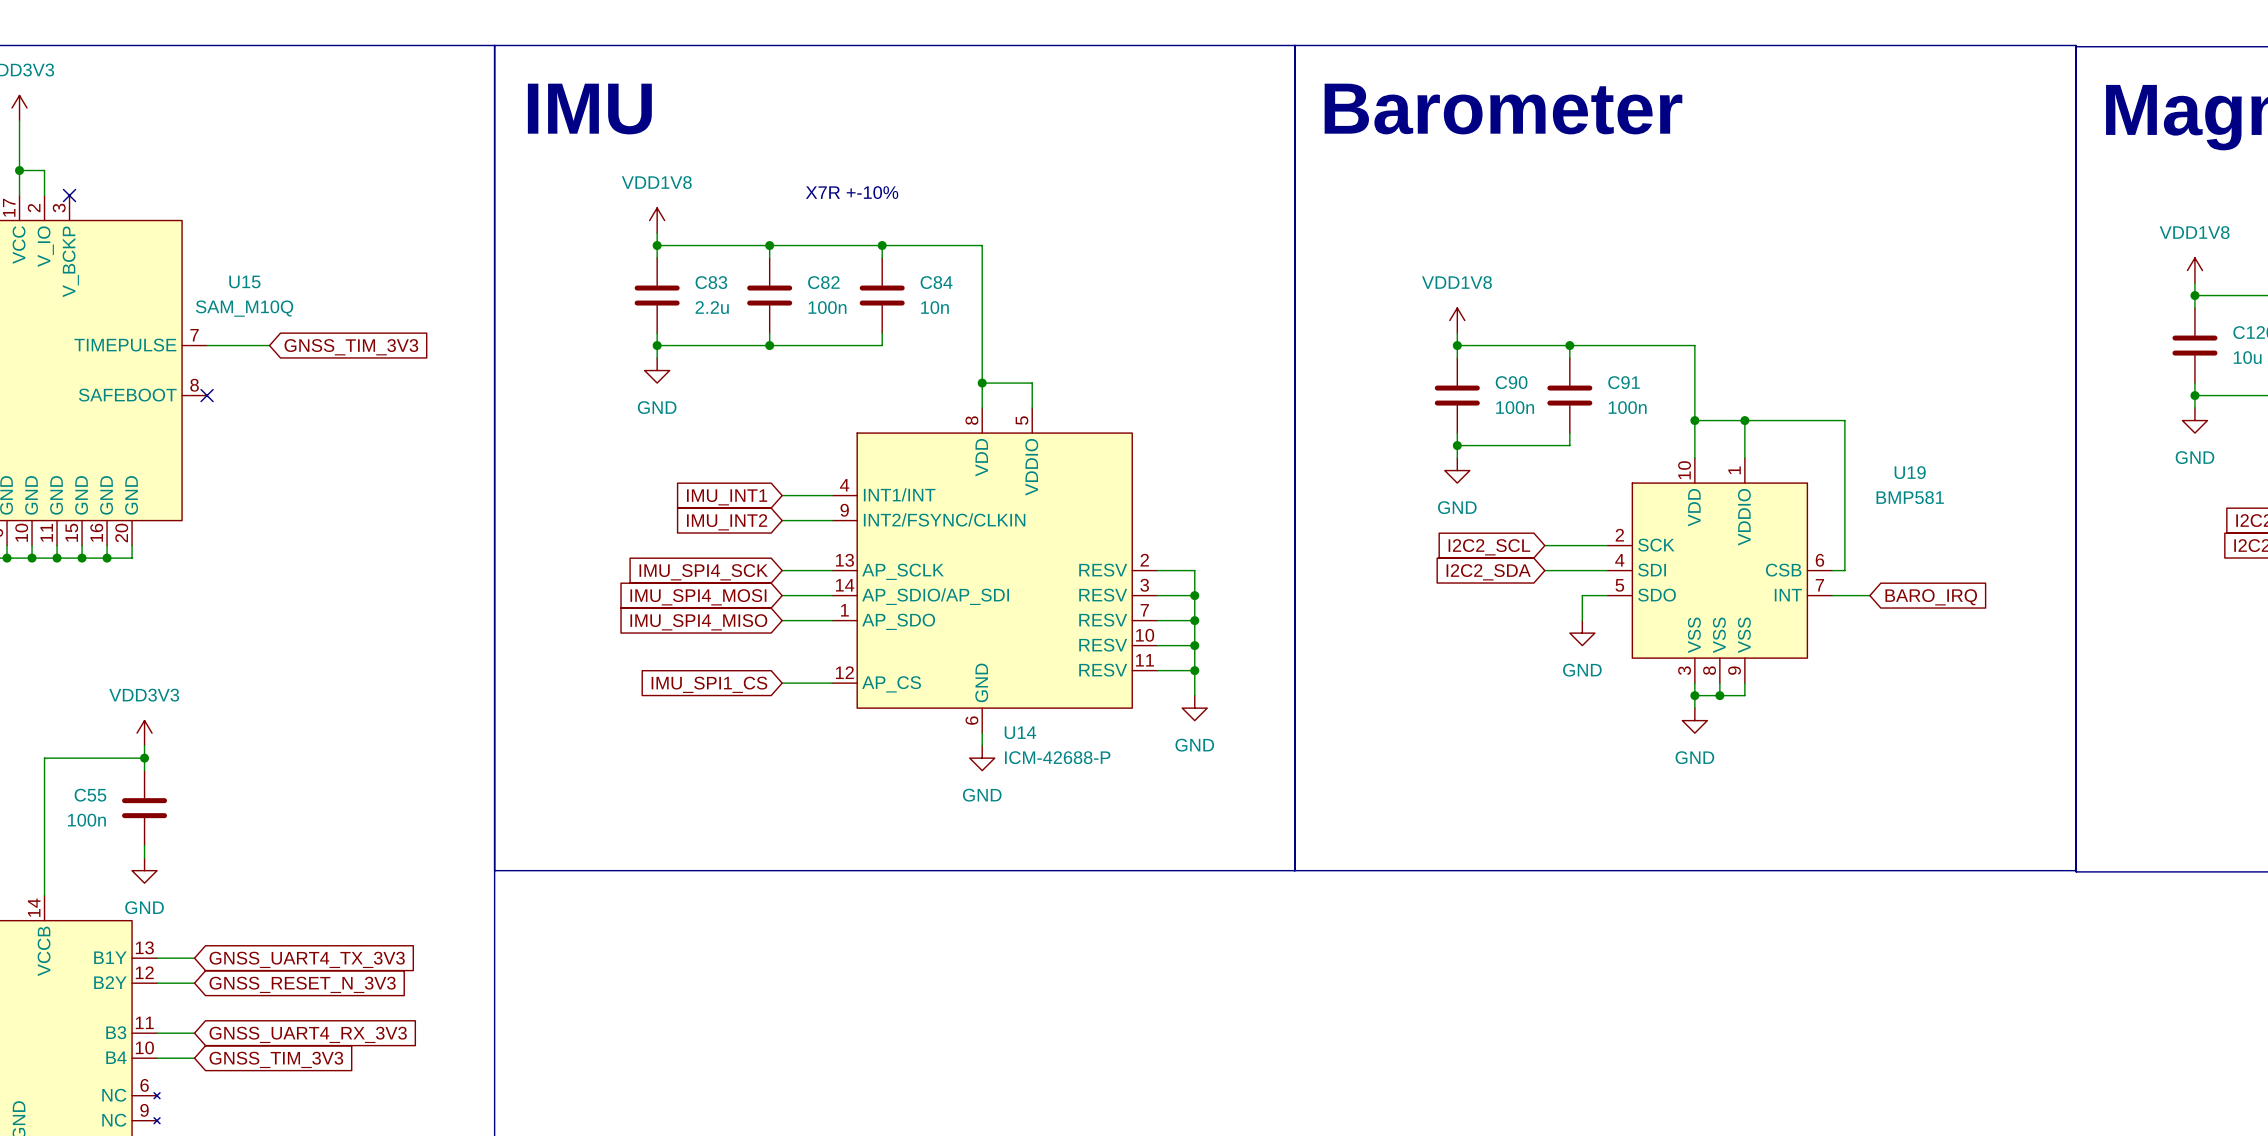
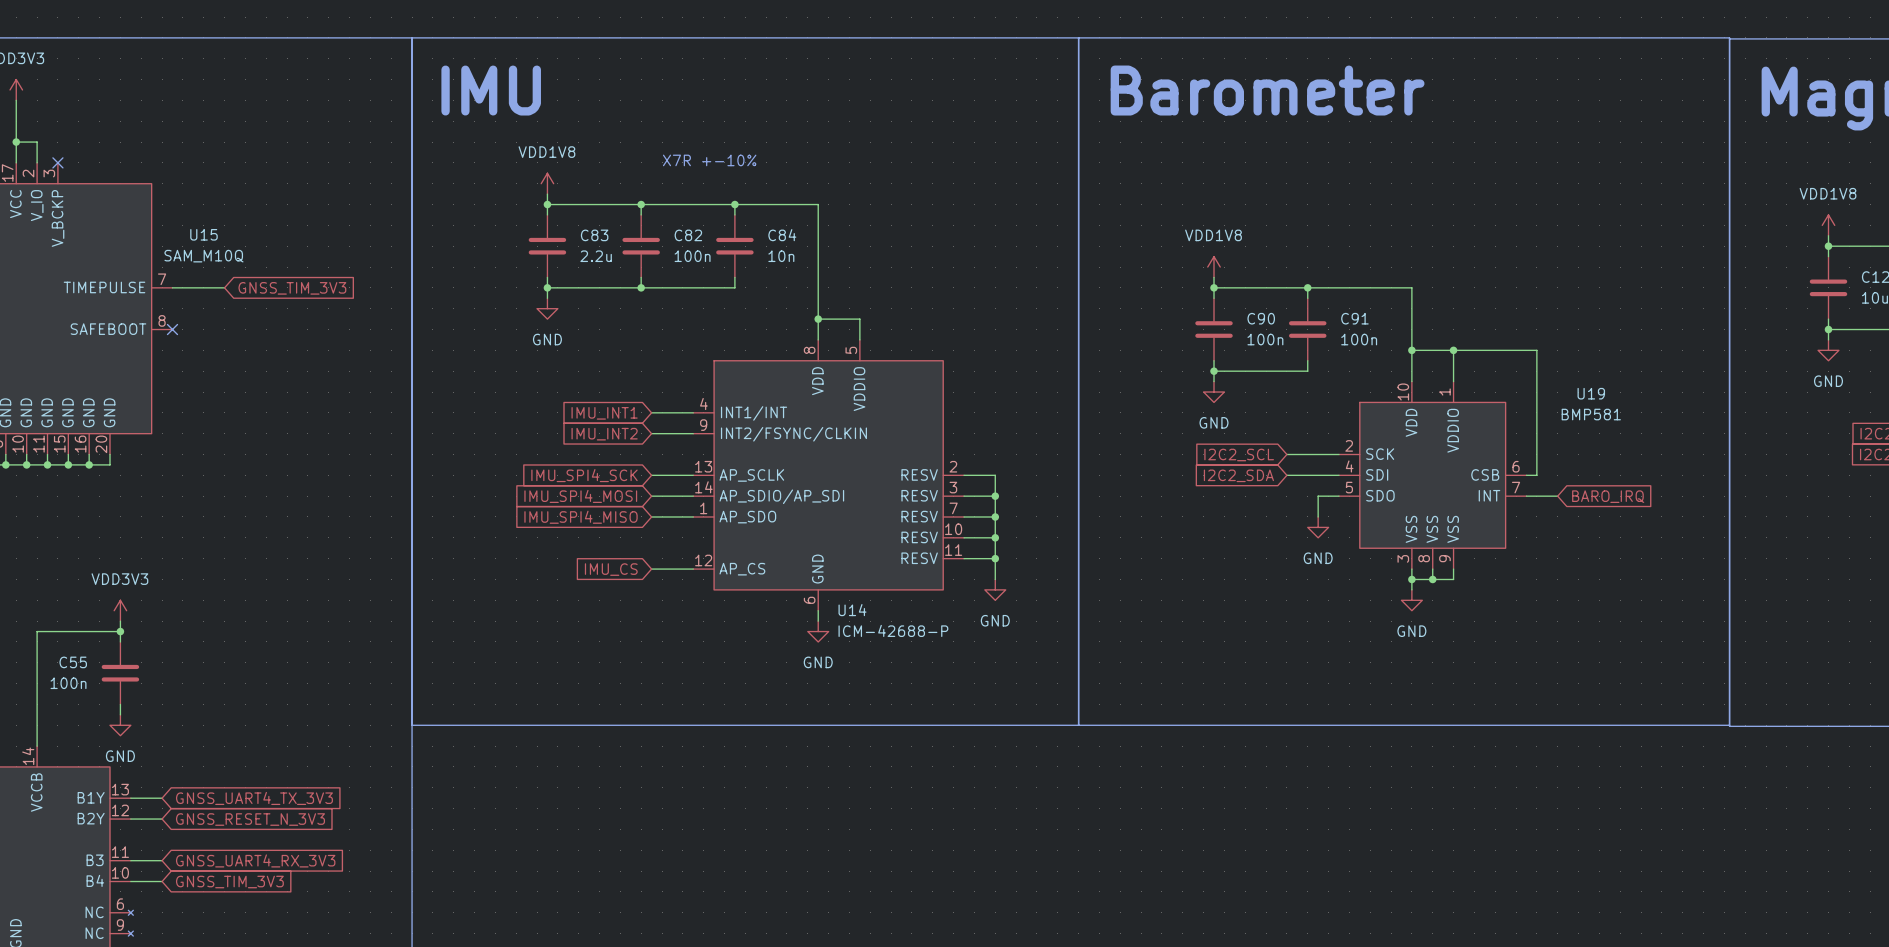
global label: IMU_SPI1_CS (709, 684) -> IMU_CS (611, 569)

